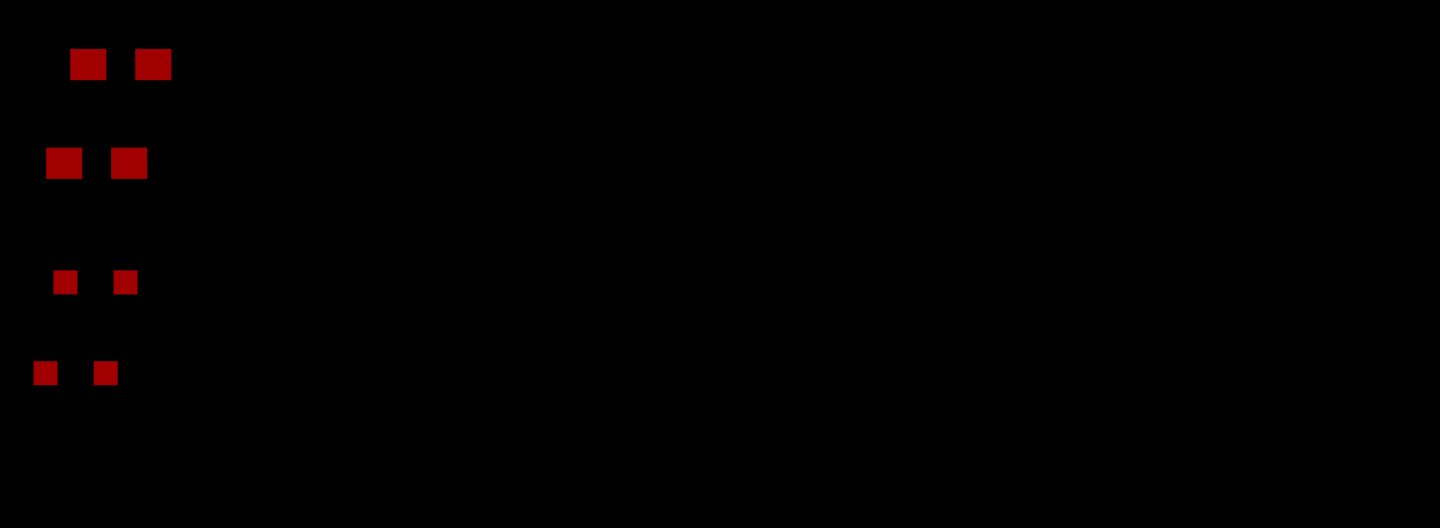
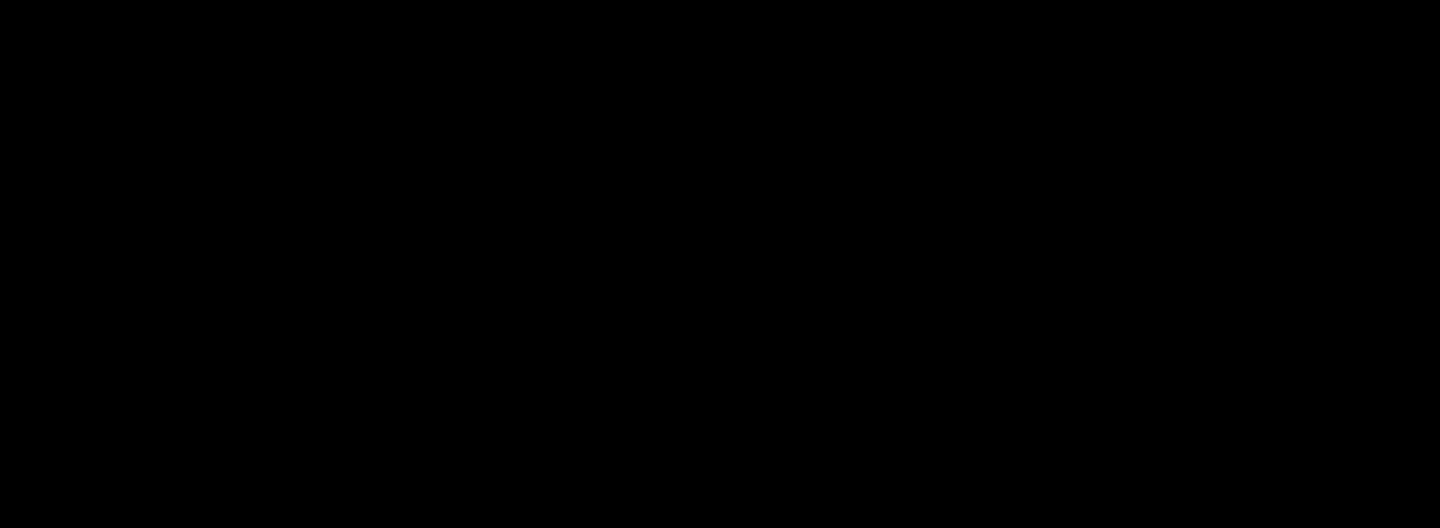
part: (120, 64) -> none
part: (96, 163) -> none
part: (95, 282) -> none
part: (75, 373) -> none

